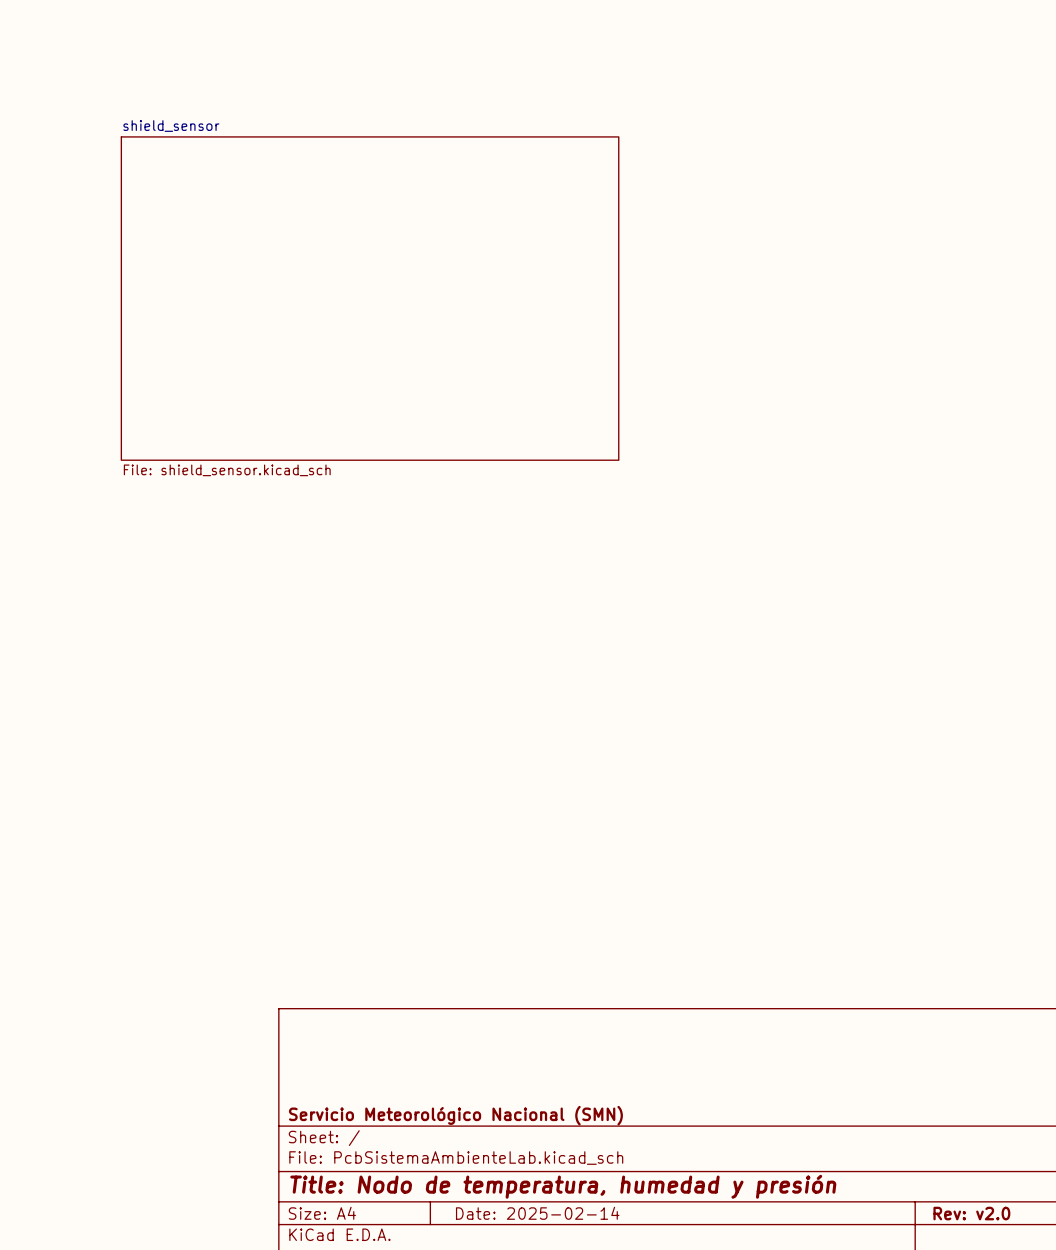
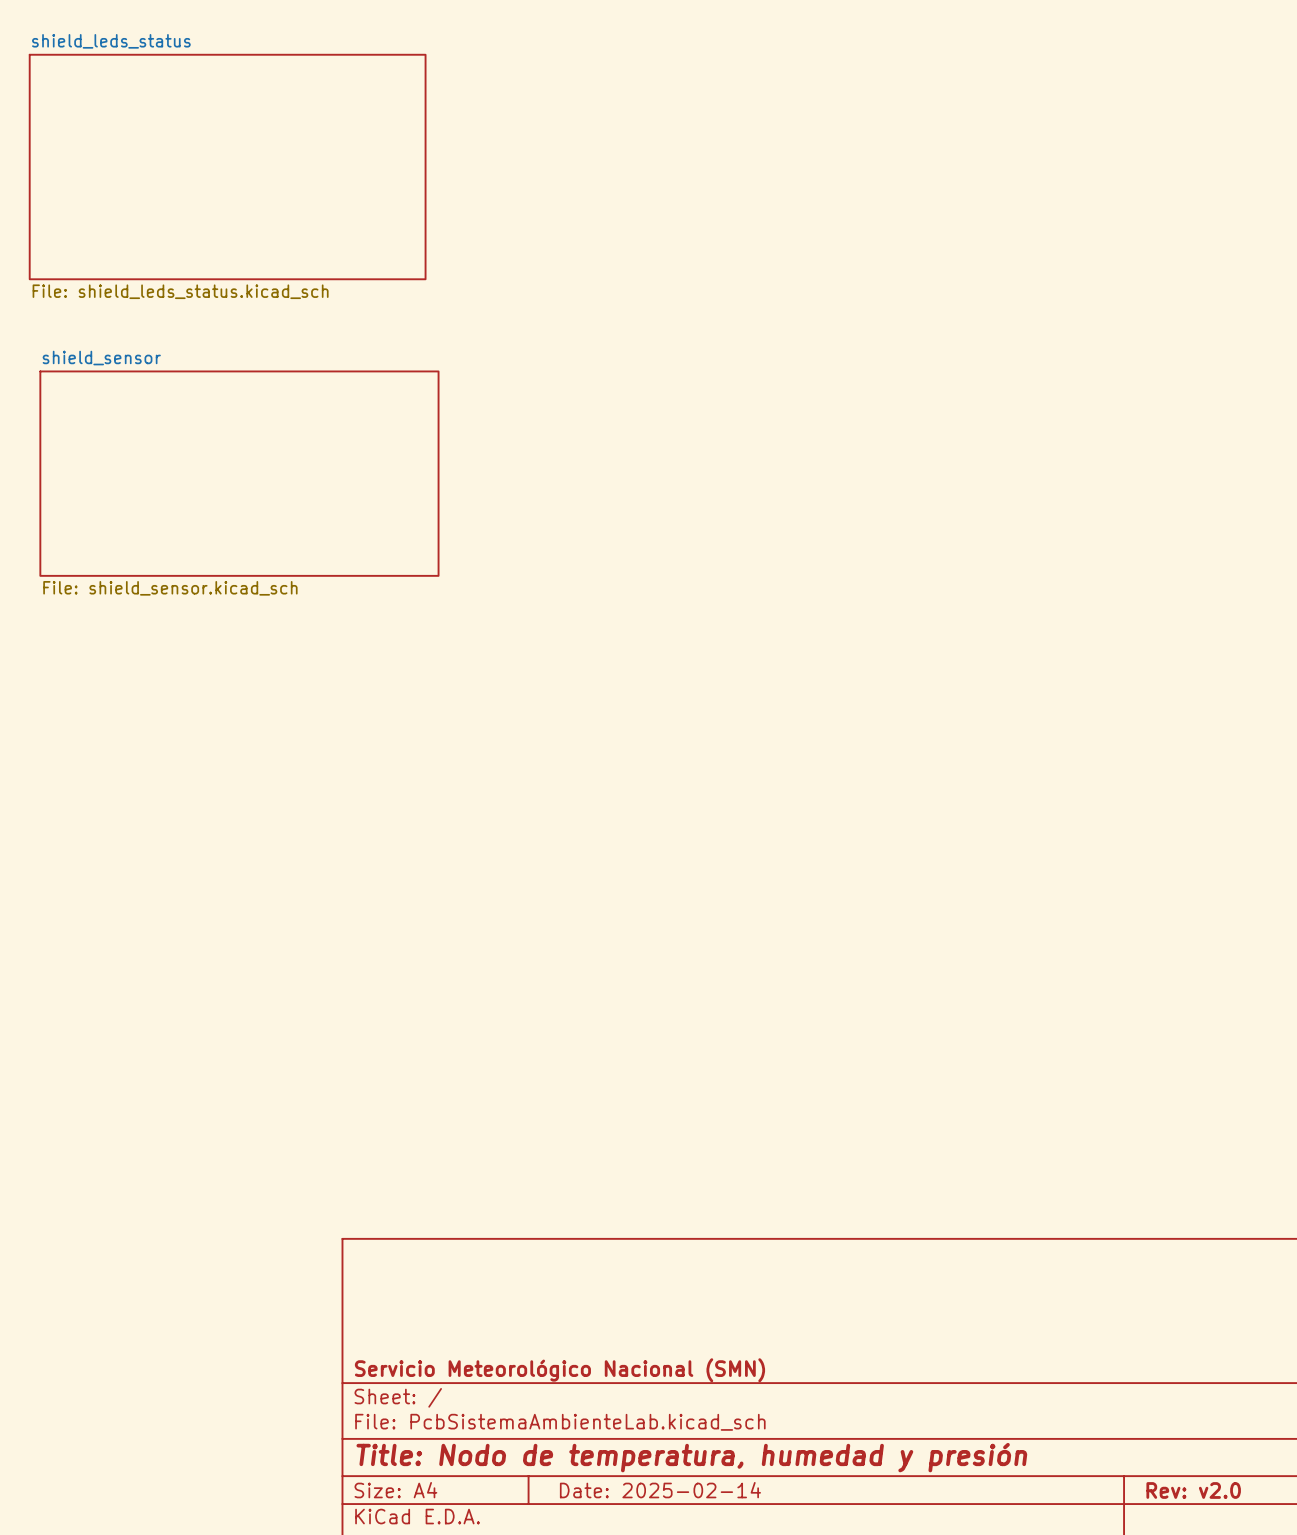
sheet shield_leds_status: none -> File: shield_leds_status.kicad_sch (227, 167)
sheet shield_sensor: File: shield_sensor.kicad_sch (370, 298) -> none
sheet shield_sensor: none -> File: shield_sensor.kicad_sch (239, 473)

